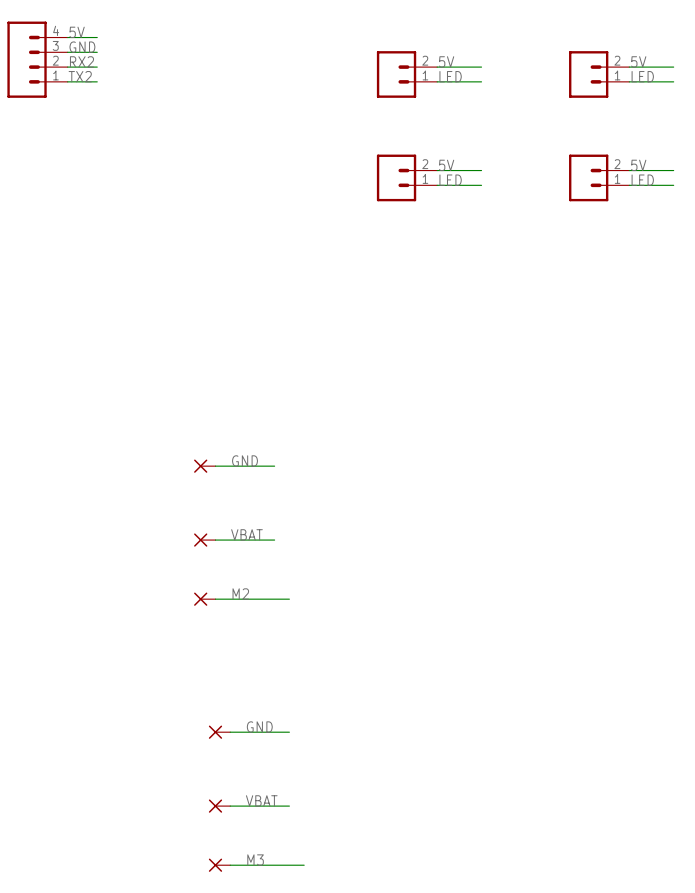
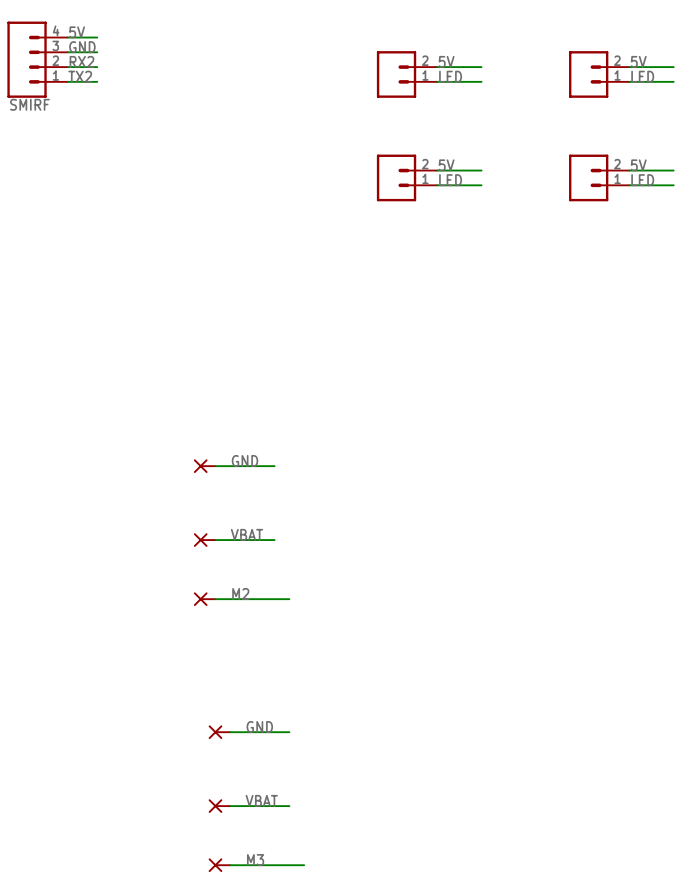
part value: none -> SMIRF (29, 104)

